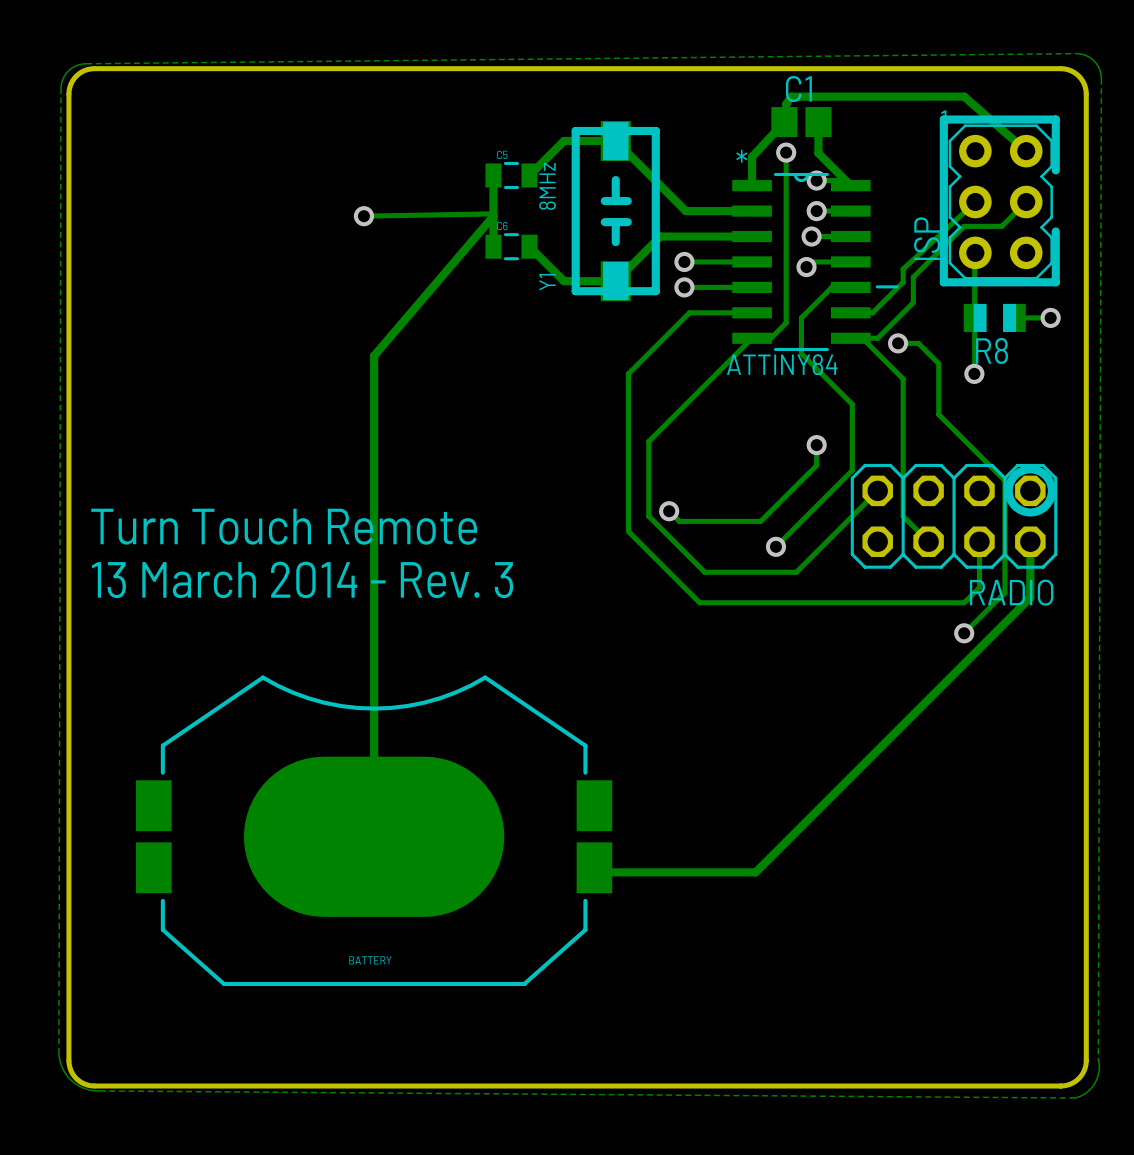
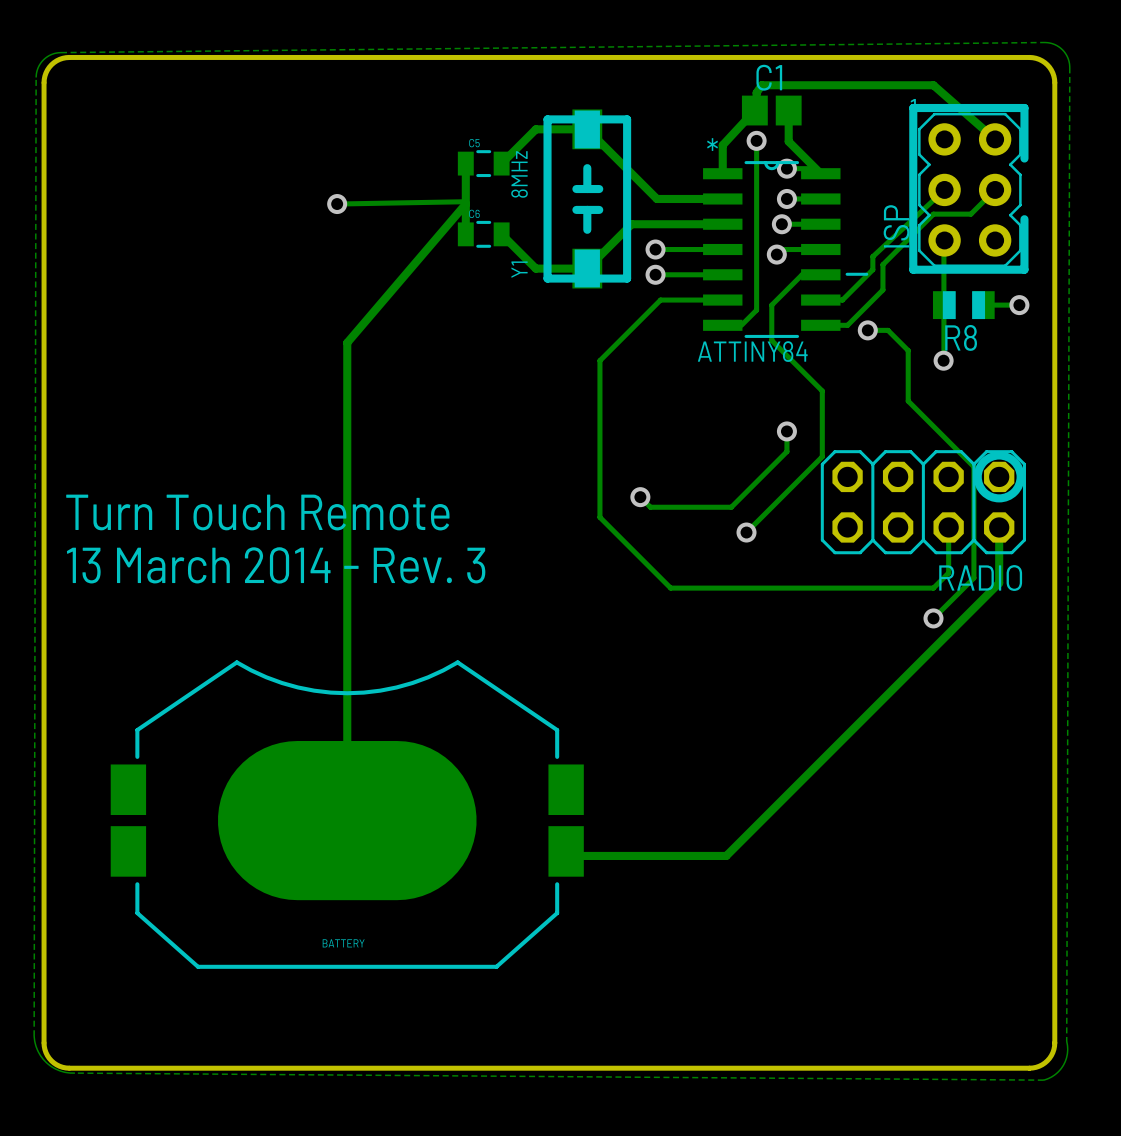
track: (770, 338) (752, 338) (648, 441) (648, 516) (704, 572) (796, 572) (877, 490) -> none
track: (862, 338) (903, 378) (903, 516) (928, 541) -> none

